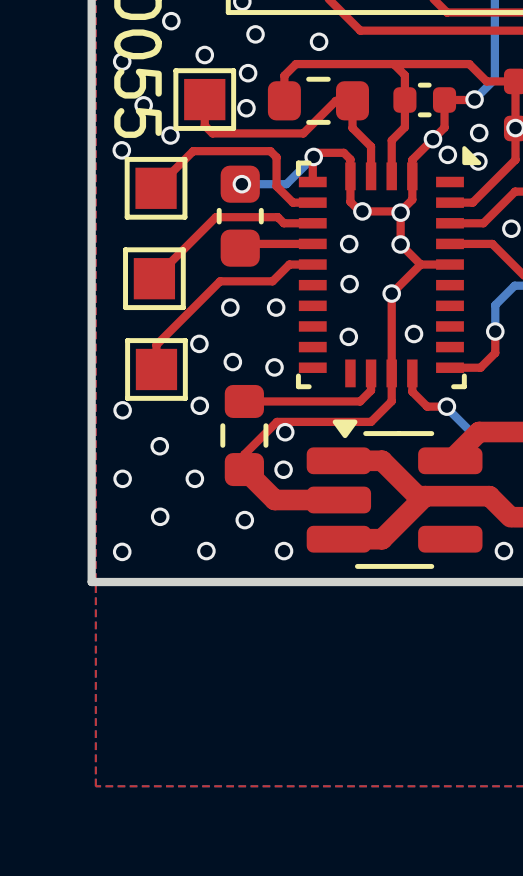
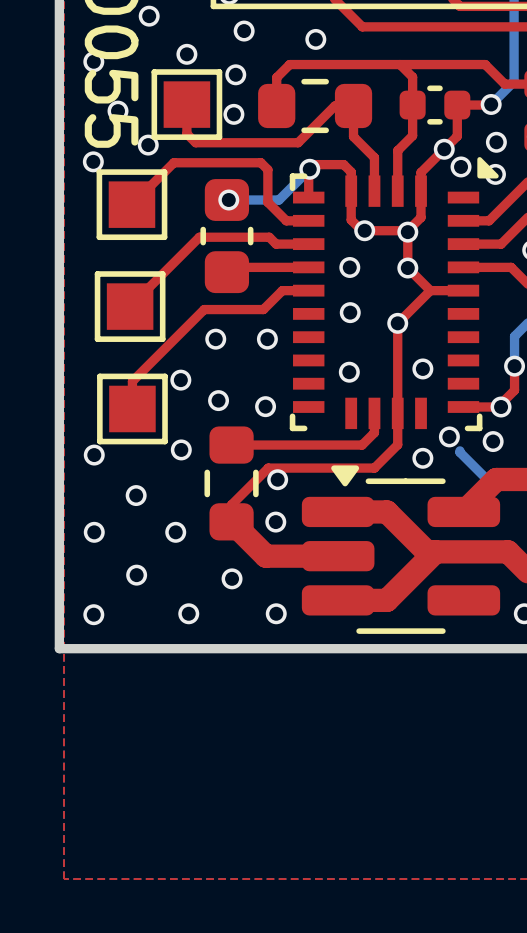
via: none -> (501, 407)
top track: (412, 373) (412, 391) (427, 406) (446, 406) -> none
via: none -> (493, 441)
via position: (446, 406) -> (449, 436)
via: none -> (422, 458)

